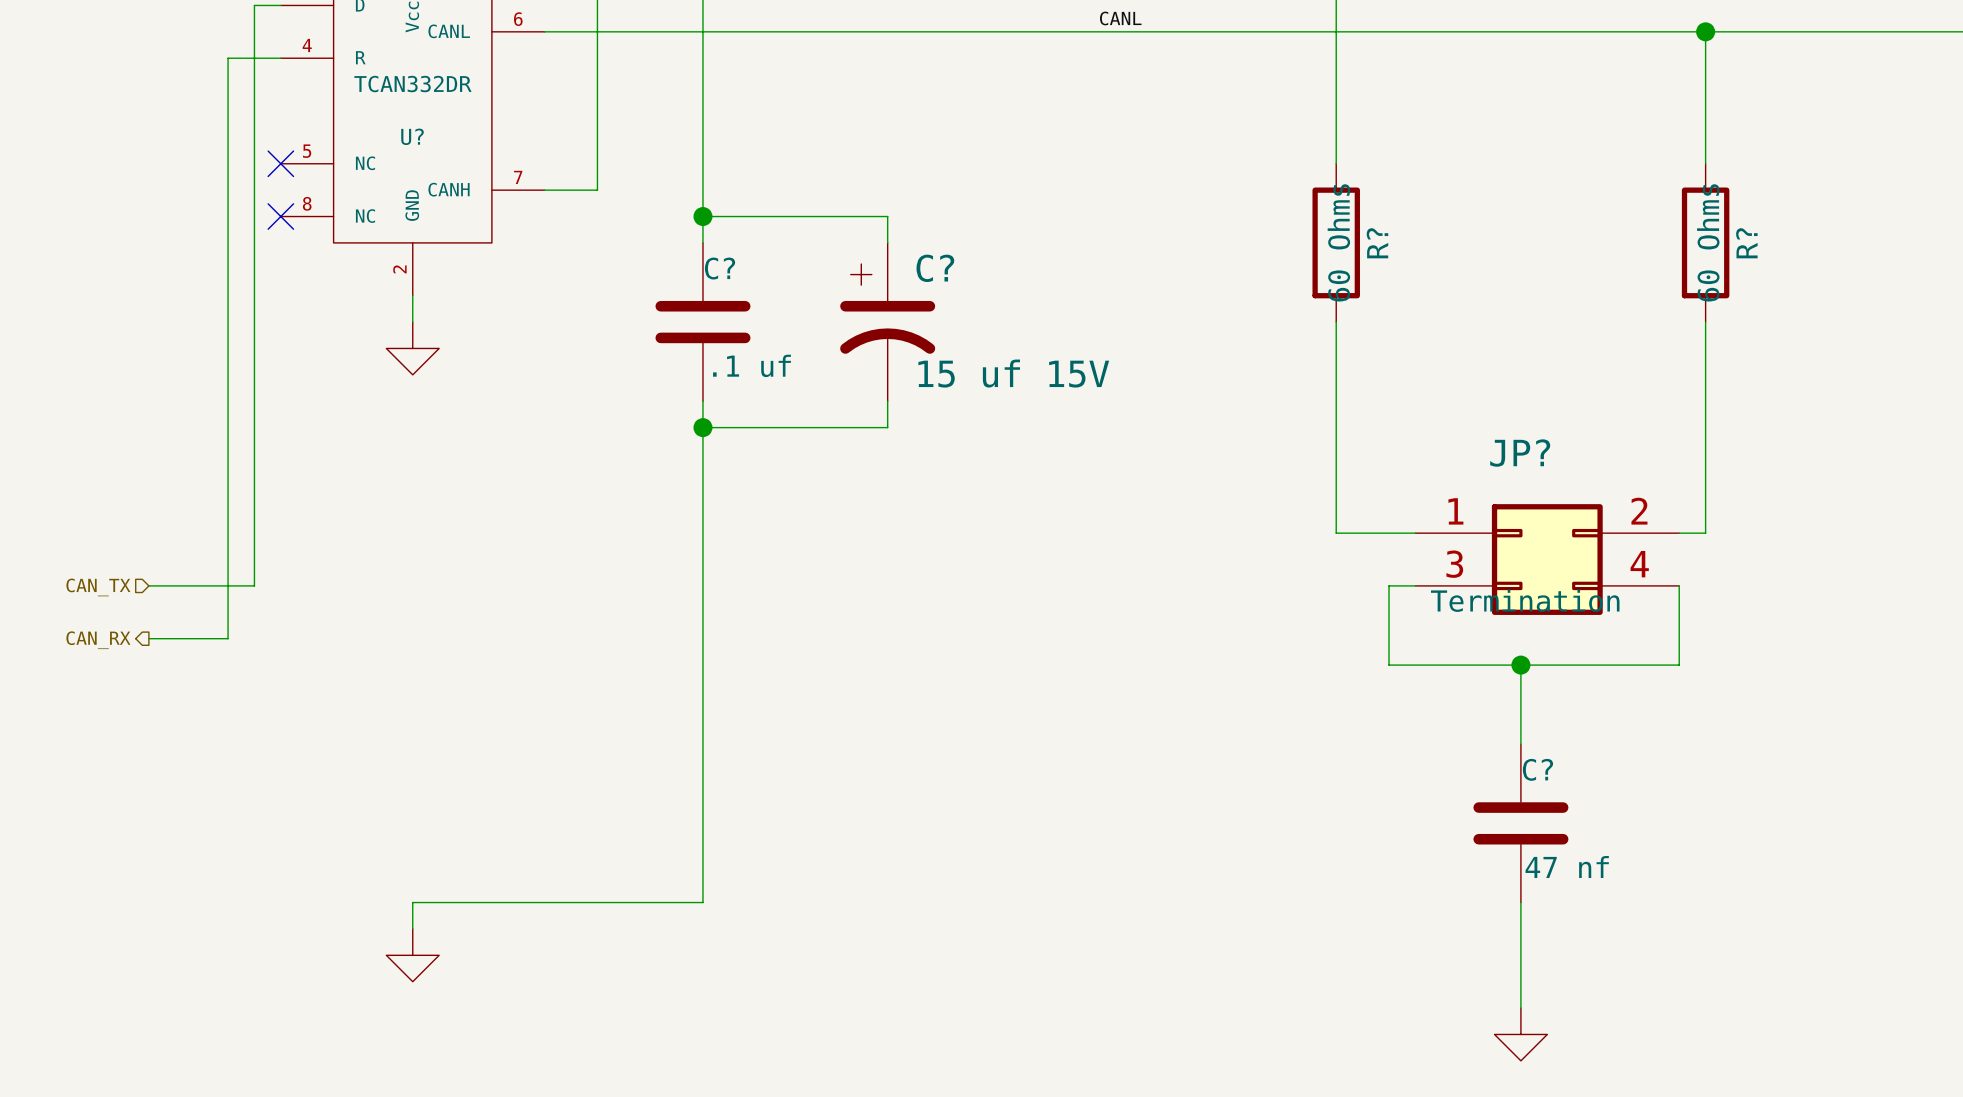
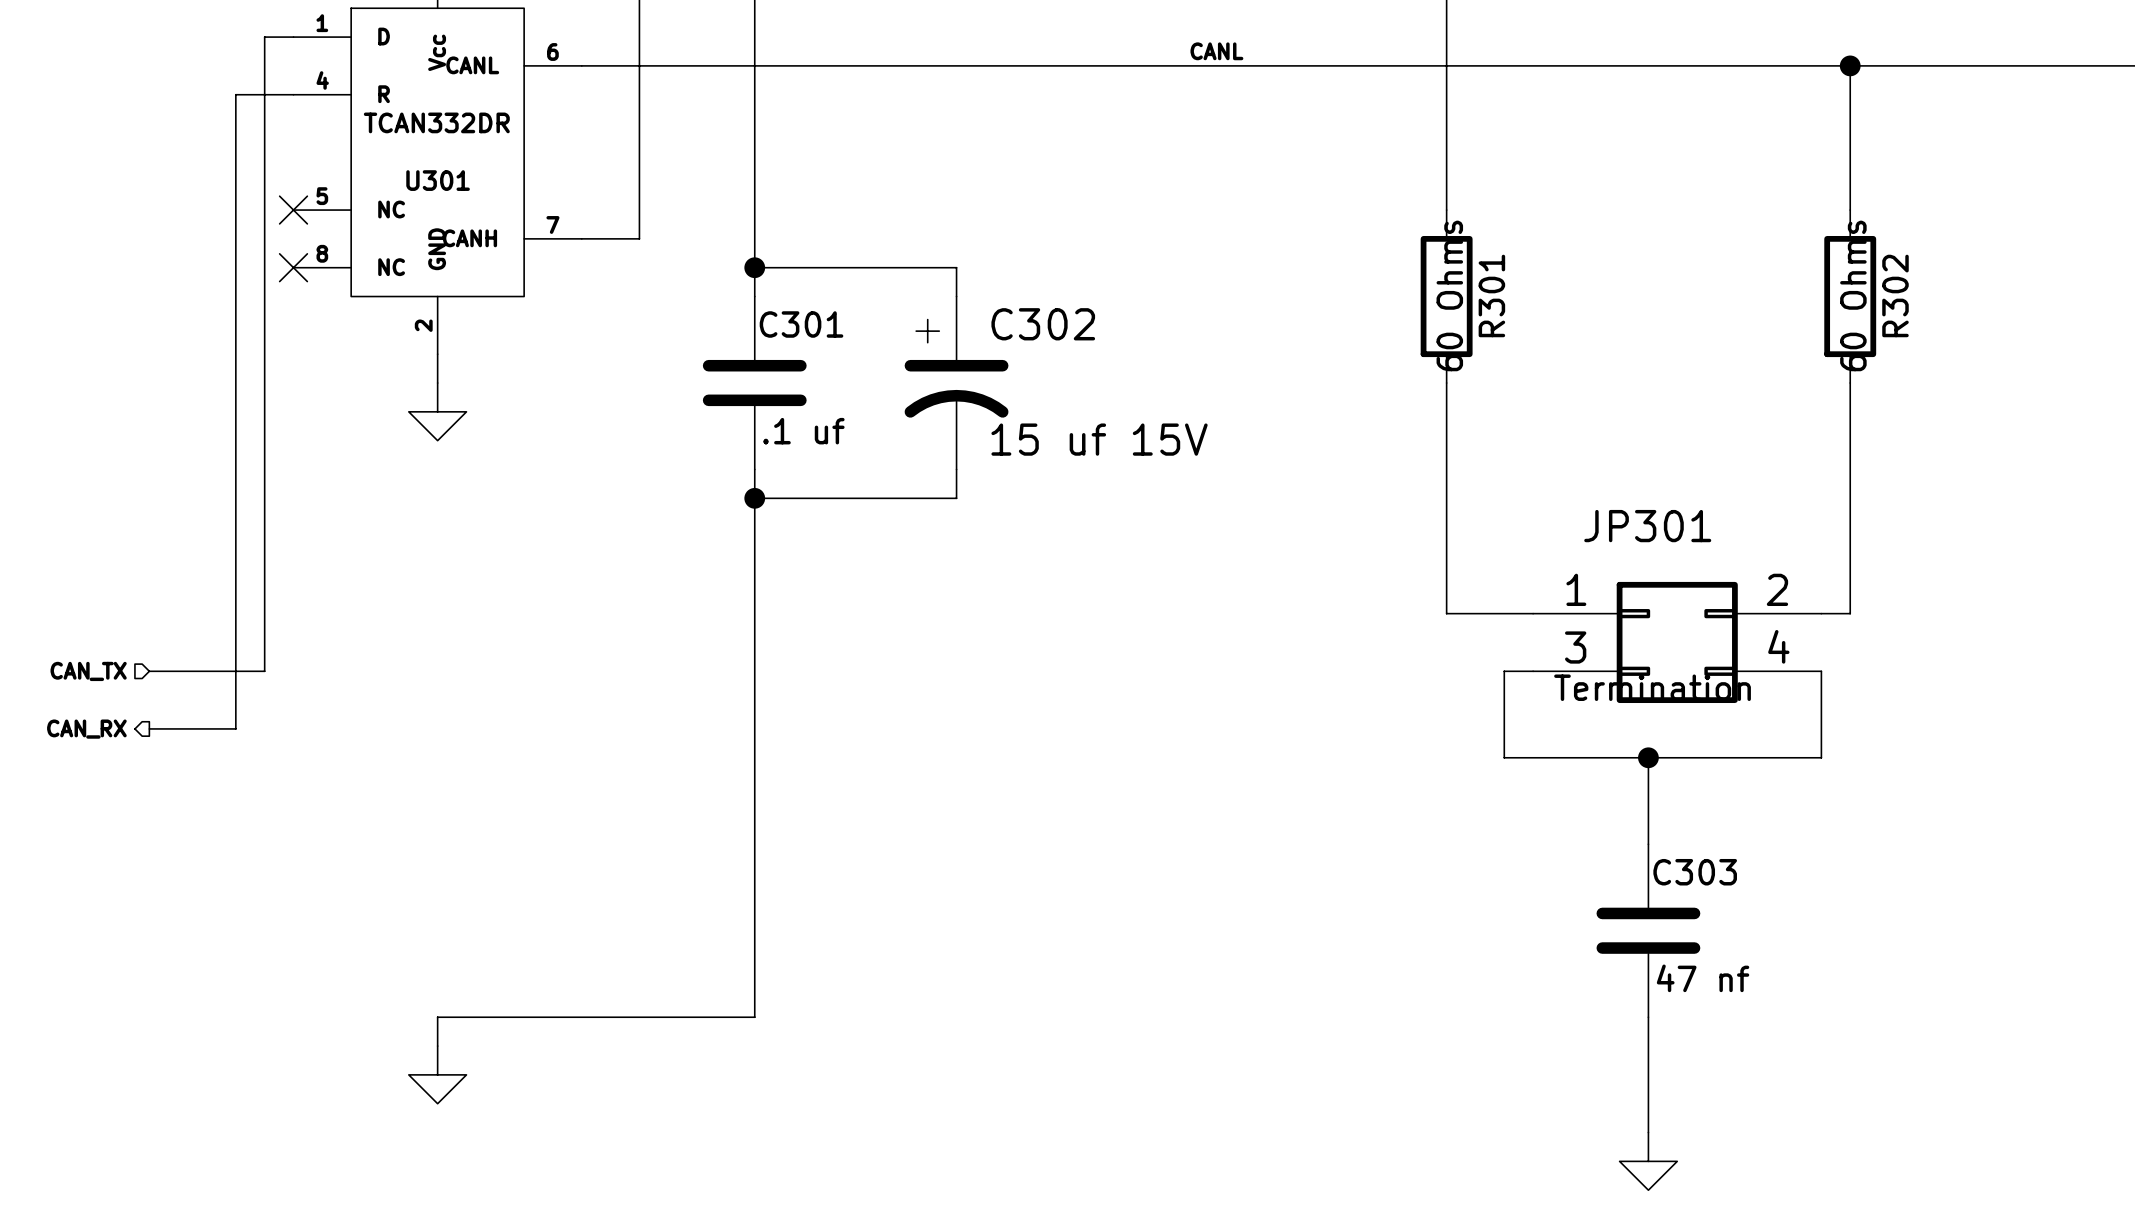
U? name: U? (412, 136) -> U301 (438, 180)
R? name: R? (1377, 243) -> R301 (1491, 295)
R? name: R? (1746, 243) -> R302 (1895, 295)
C? name: C? (720, 268) -> C301 (801, 324)
C? name: C? (935, 268) -> C302 (1043, 324)
JP? name: JP? (1520, 453) -> JP301 (1647, 526)
C? name: C? (1537, 769) -> C303 (1695, 872)

